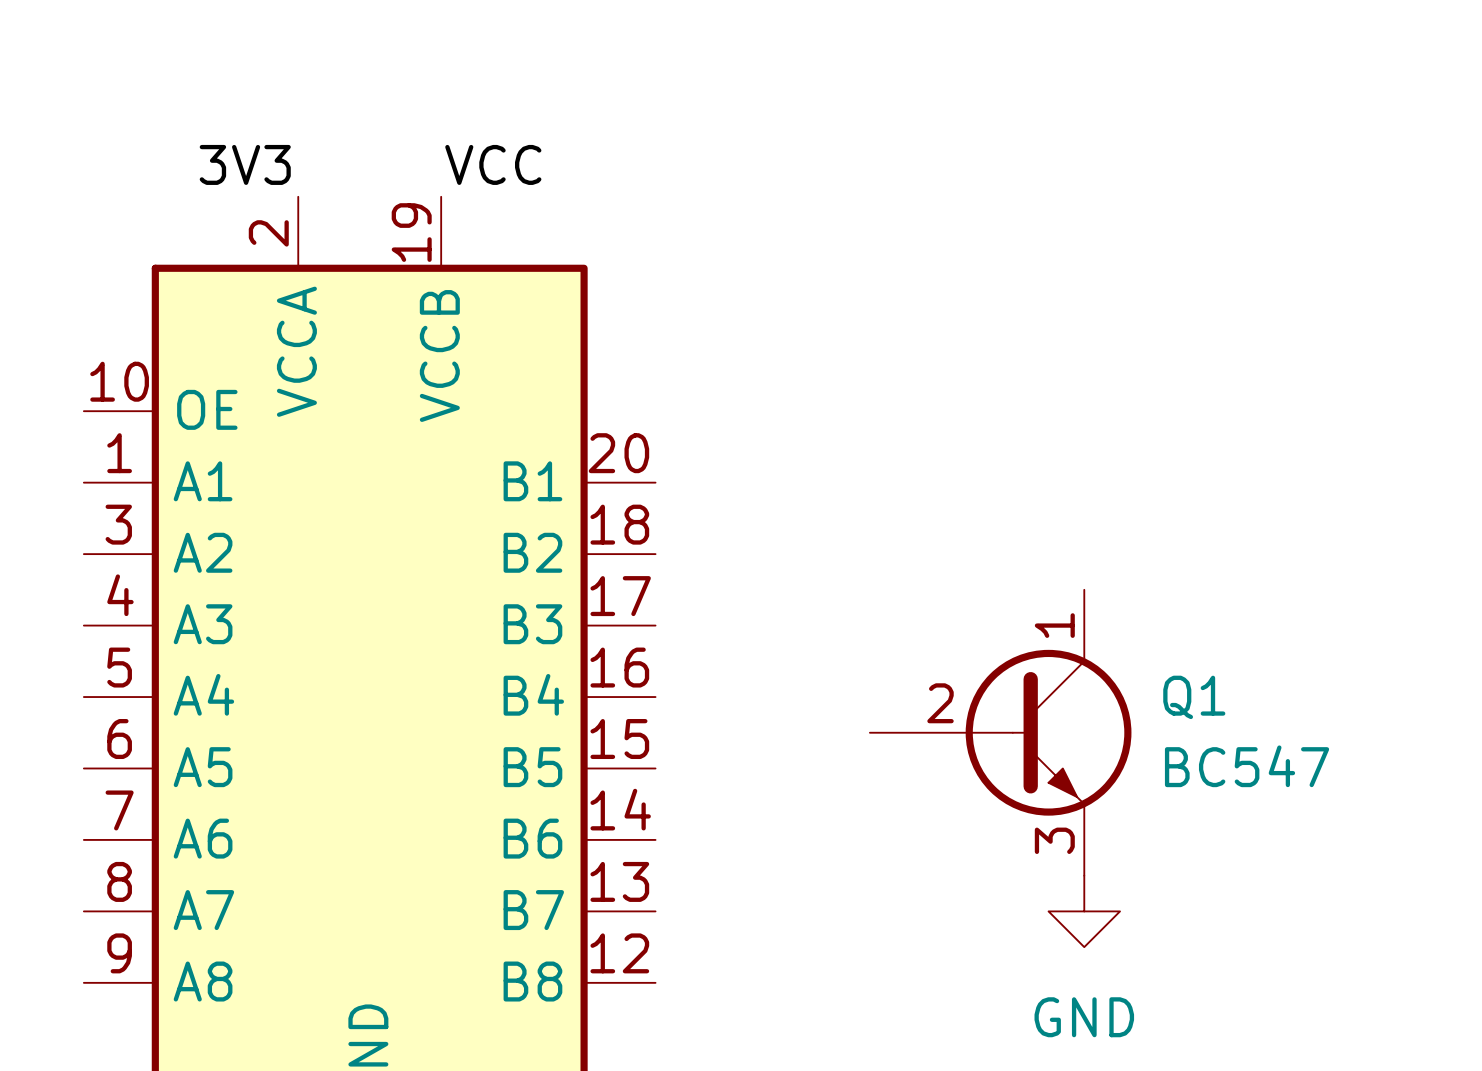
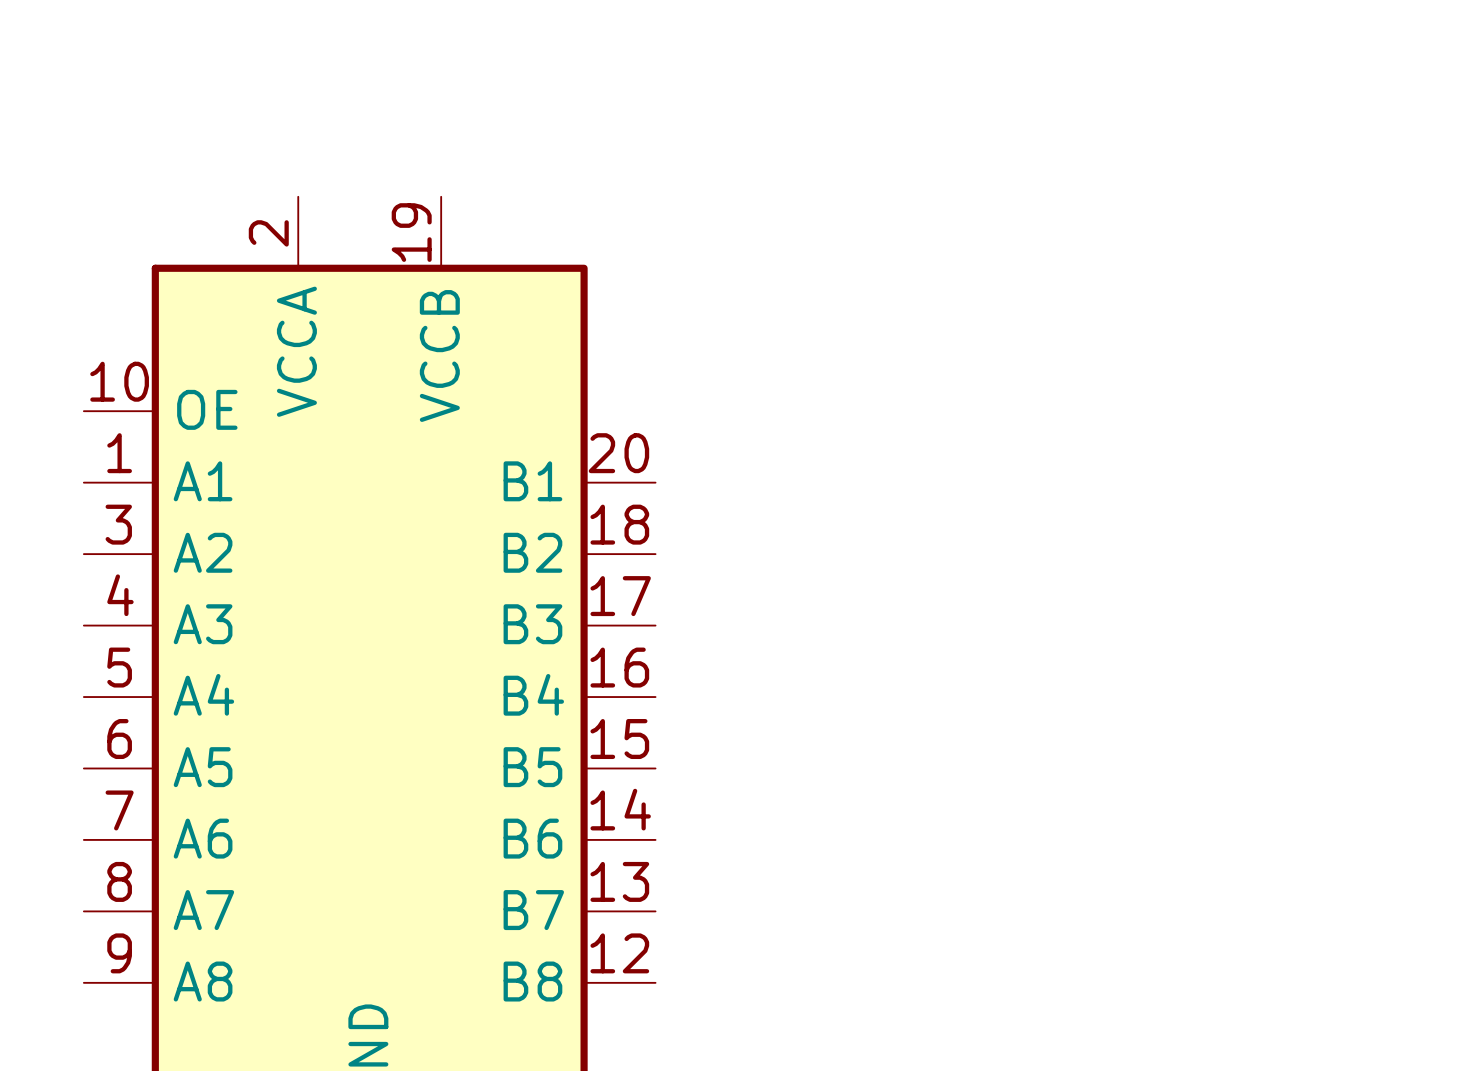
label: 3V3 (245, 164) -> none
label: VCC (493, 164) -> none
Q1: BC547 (1000, 732) -> none
power symbol: GND (1084, 911) -> none

